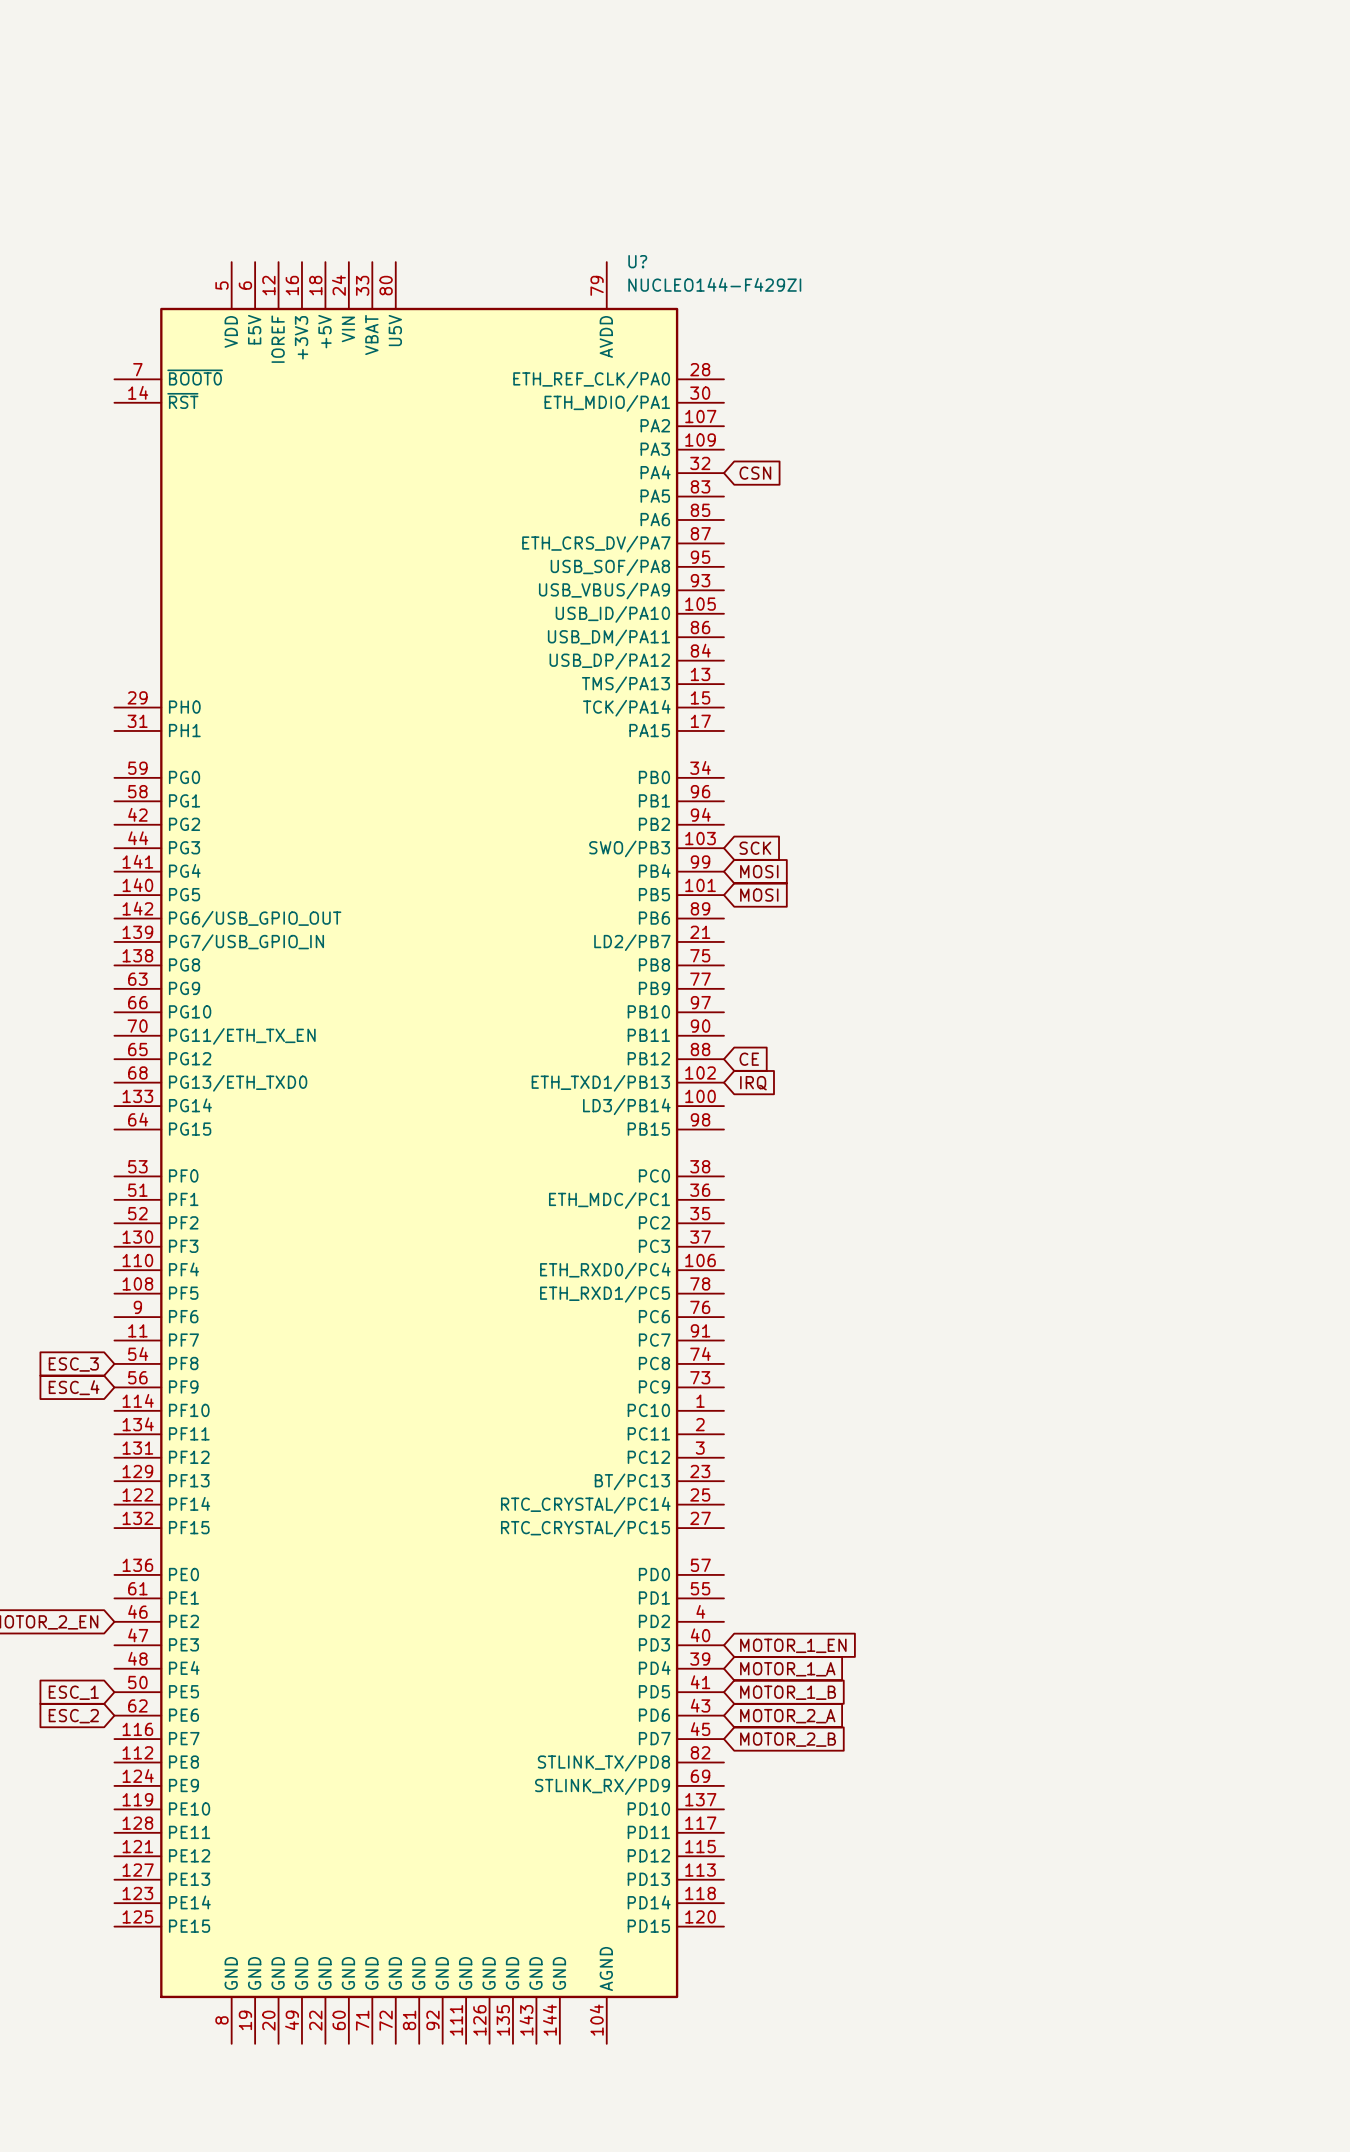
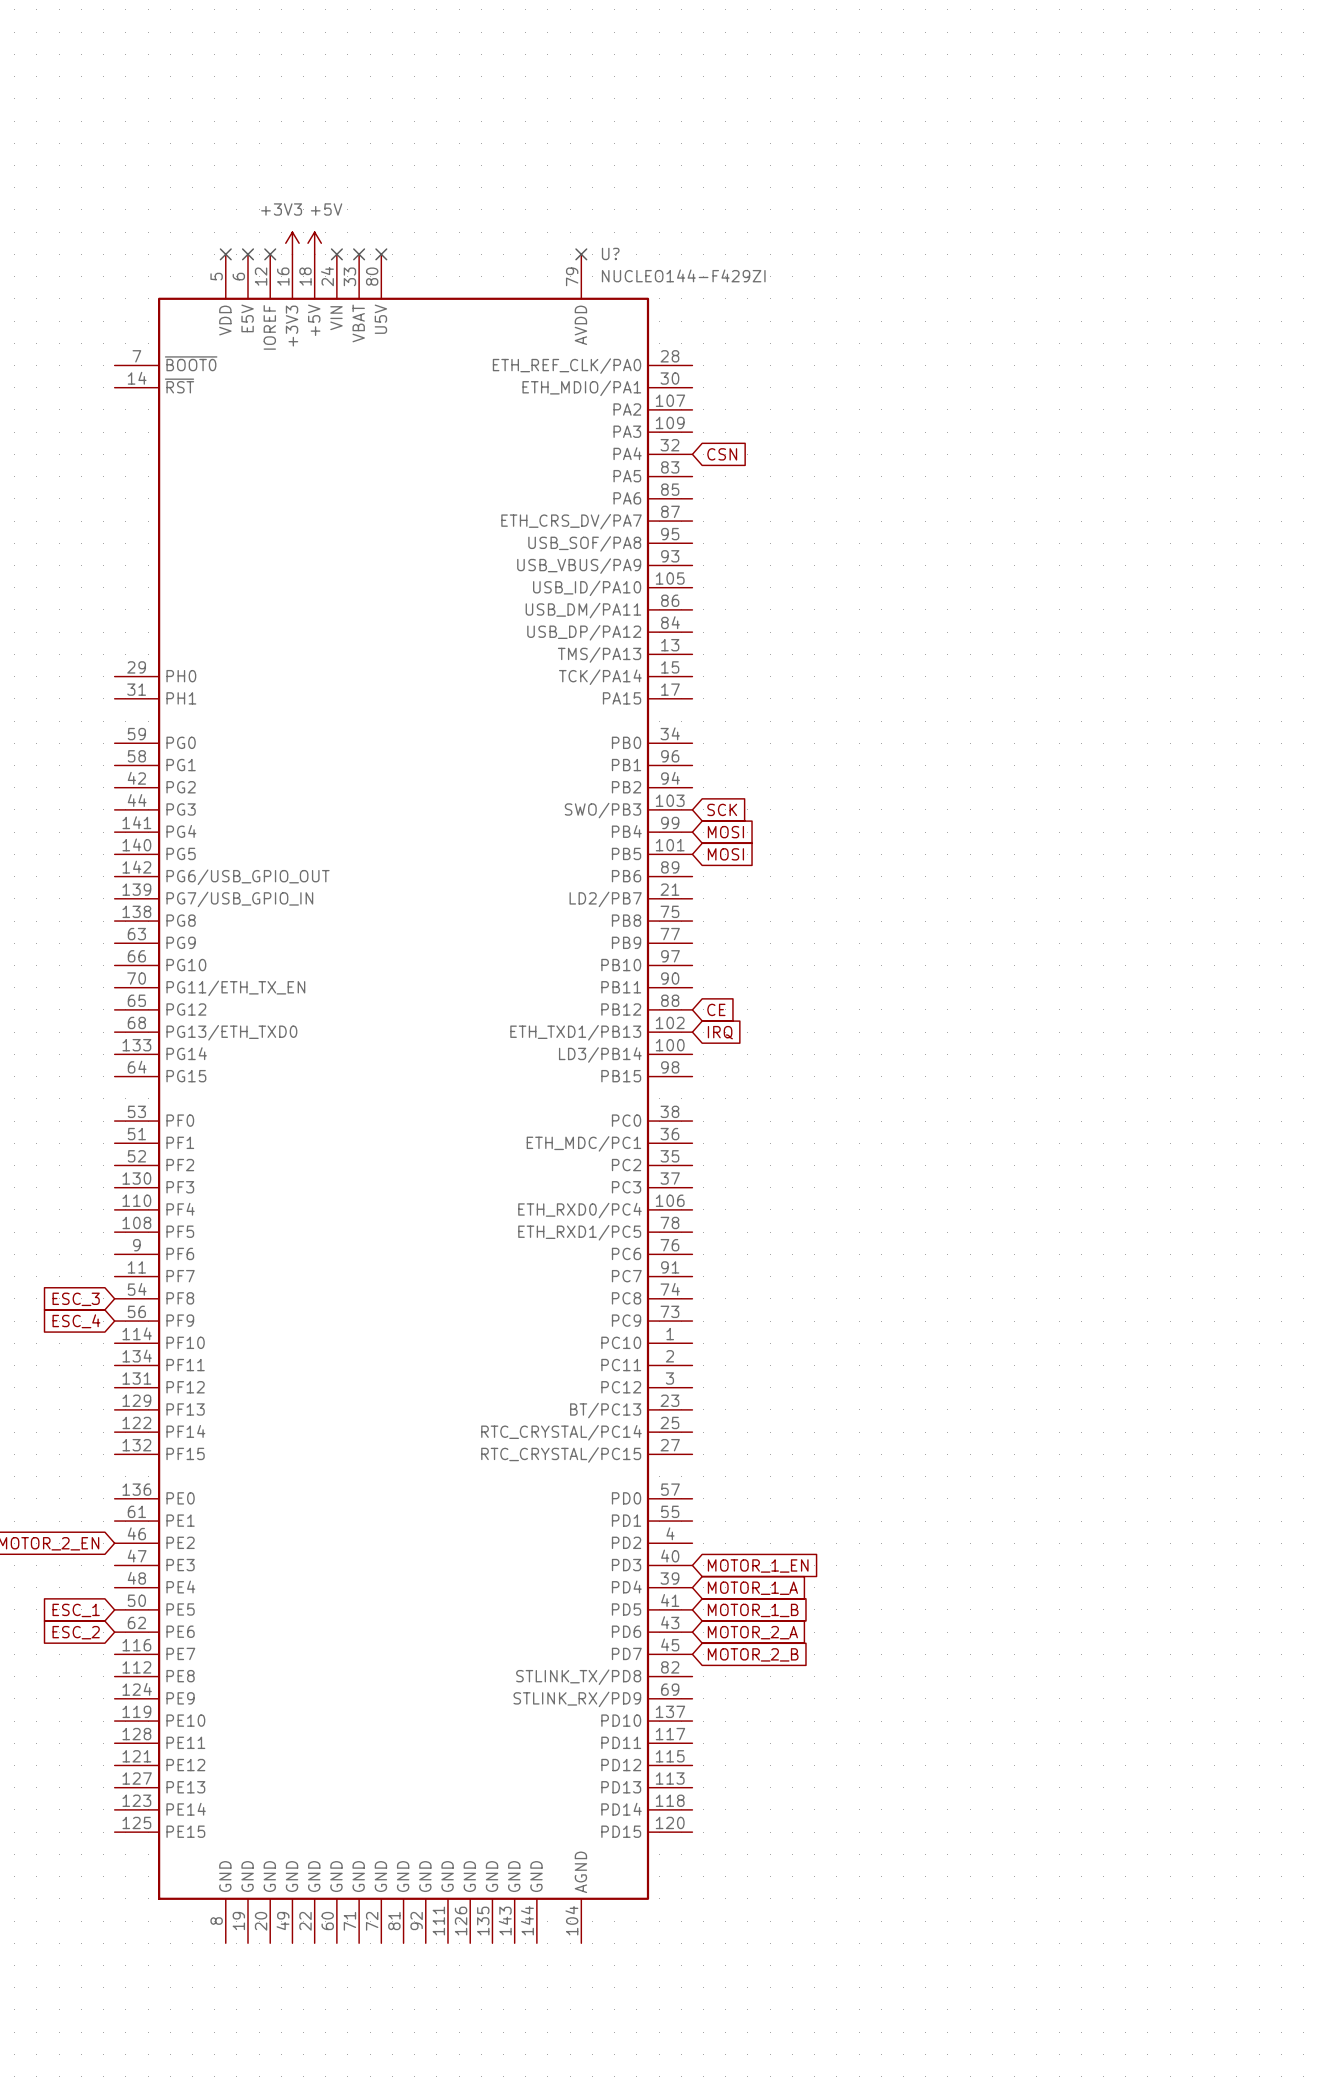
power symbol: none -> +3V3 (292, 243)
power symbol: none -> +5V (314, 243)
no-connect mark: none -> (225, 254)
no-connect mark: none -> (248, 254)
no-connect mark: none -> (270, 254)
no-connect mark: none -> (336, 254)
no-connect mark: none -> (359, 254)
no-connect mark: none -> (381, 254)
no-connect mark: none -> (581, 254)

